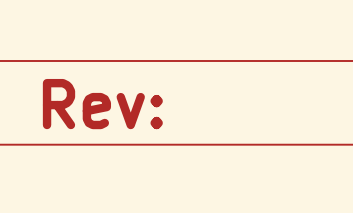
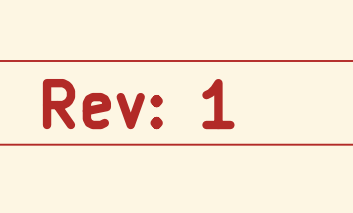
title block: Rev: (102, 104) -> Rev: 1 (138, 104)

